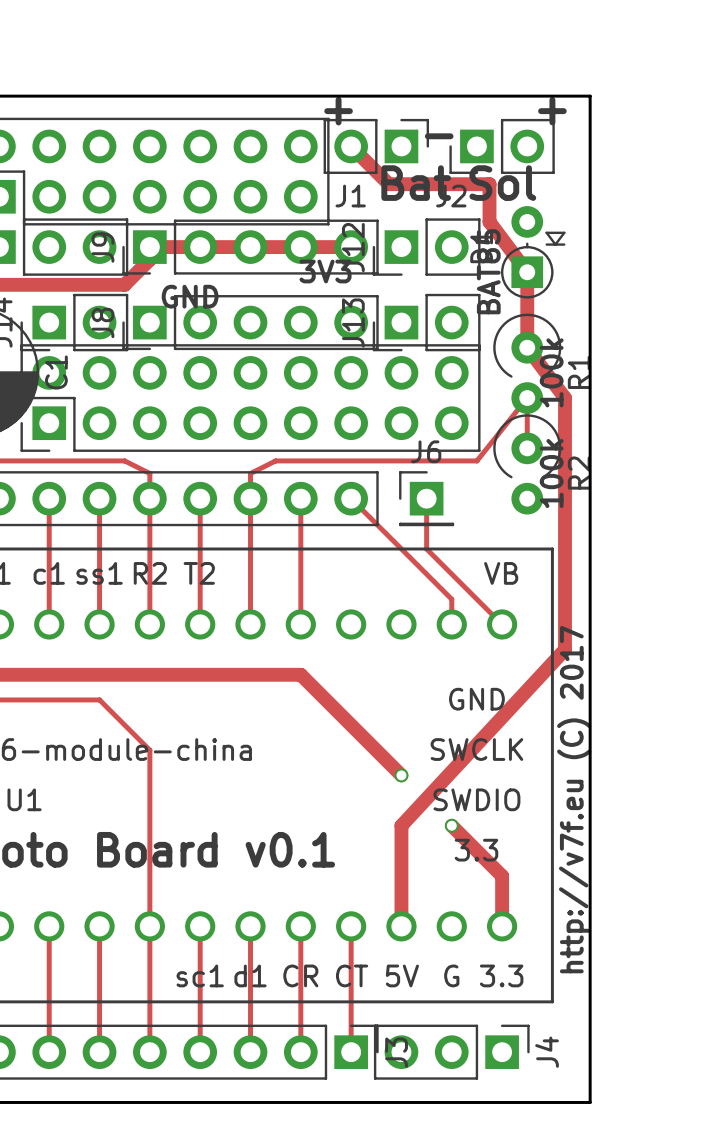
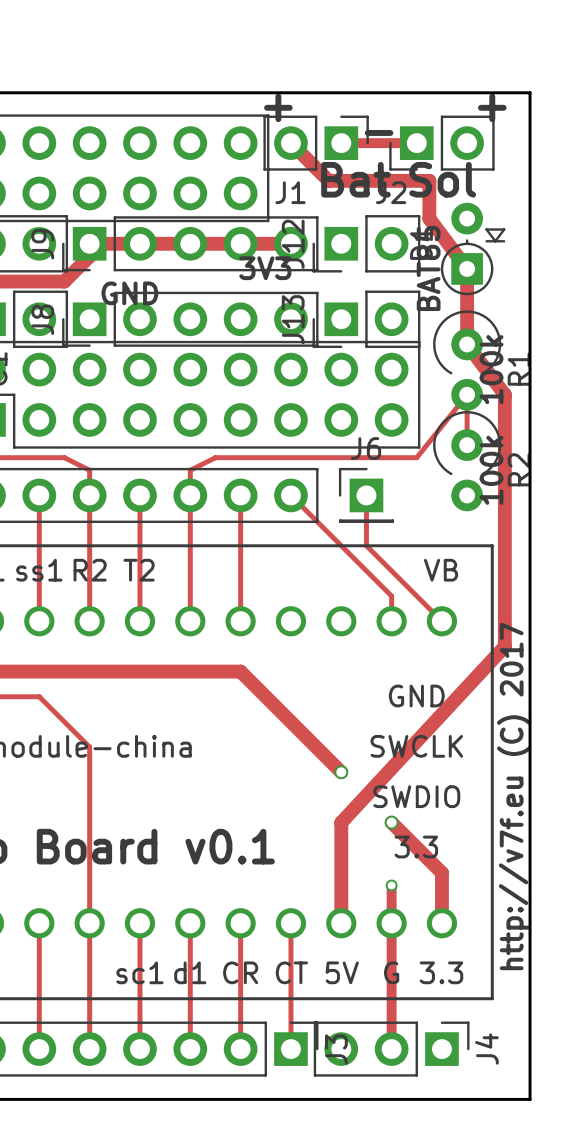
track: none -> (341, 143) (416, 143)
track: none -> (391, 885) (391, 1049)
via: none -> (391, 885)

